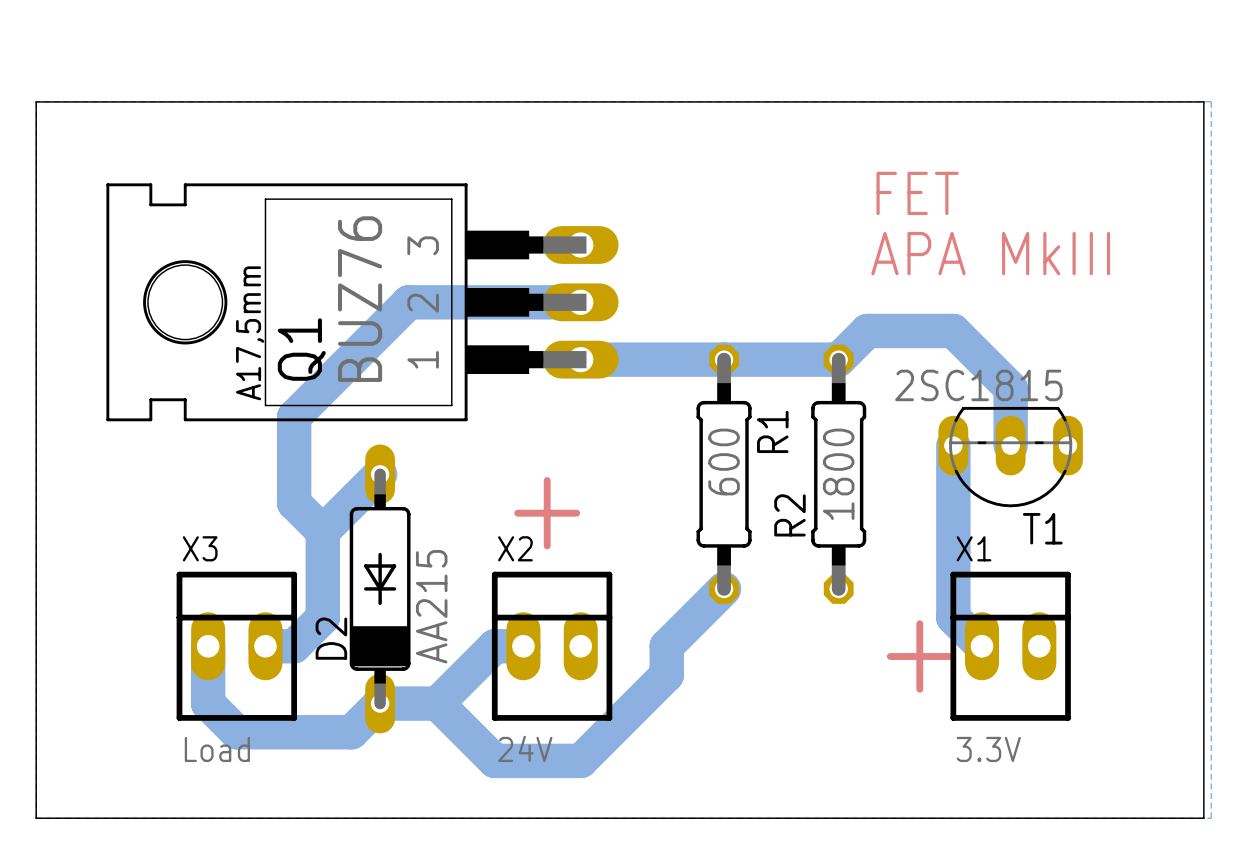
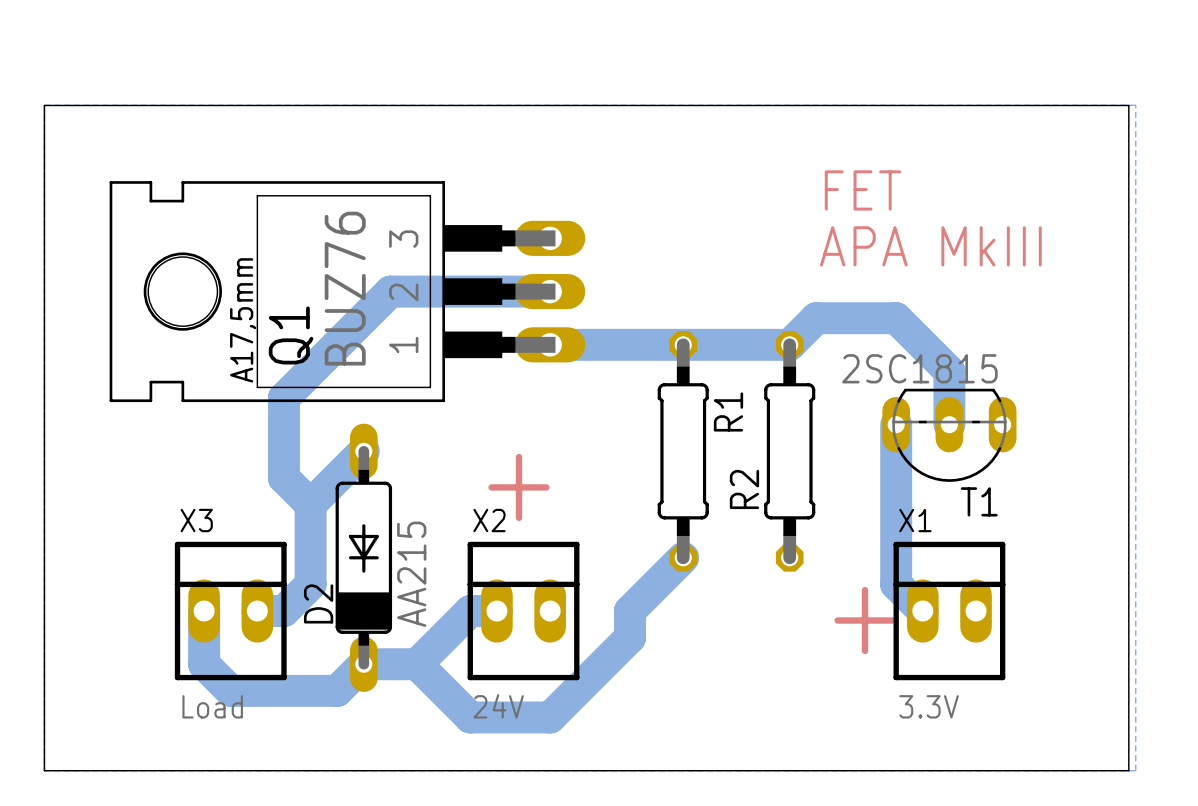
R1 value: 600 (724, 462) -> none
R2 value: 1800 (838, 474) -> none

